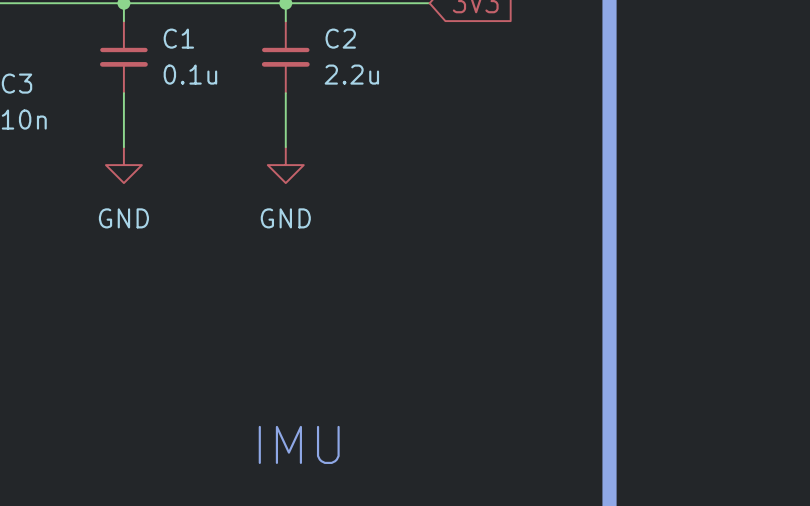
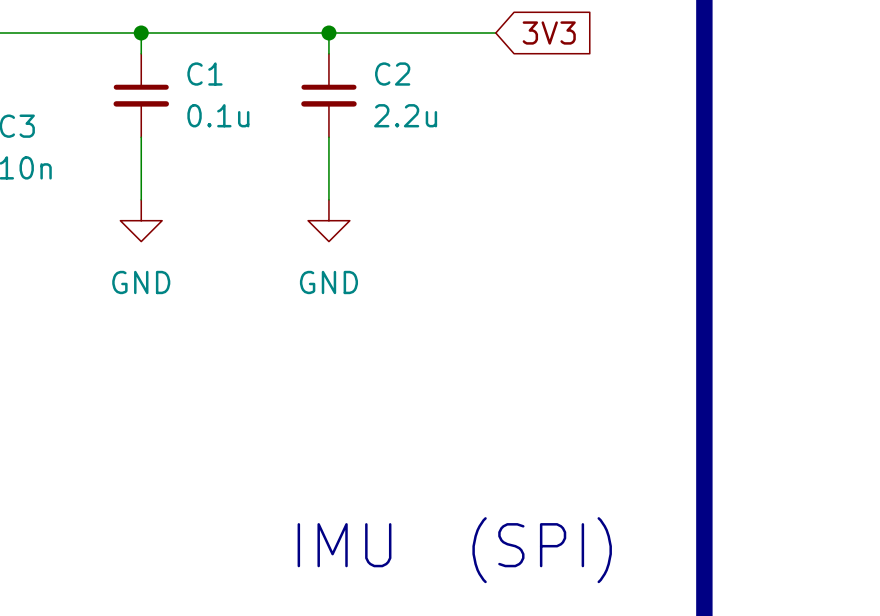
text: IMU (299, 444) -> IMU (SPI) (454, 550)

